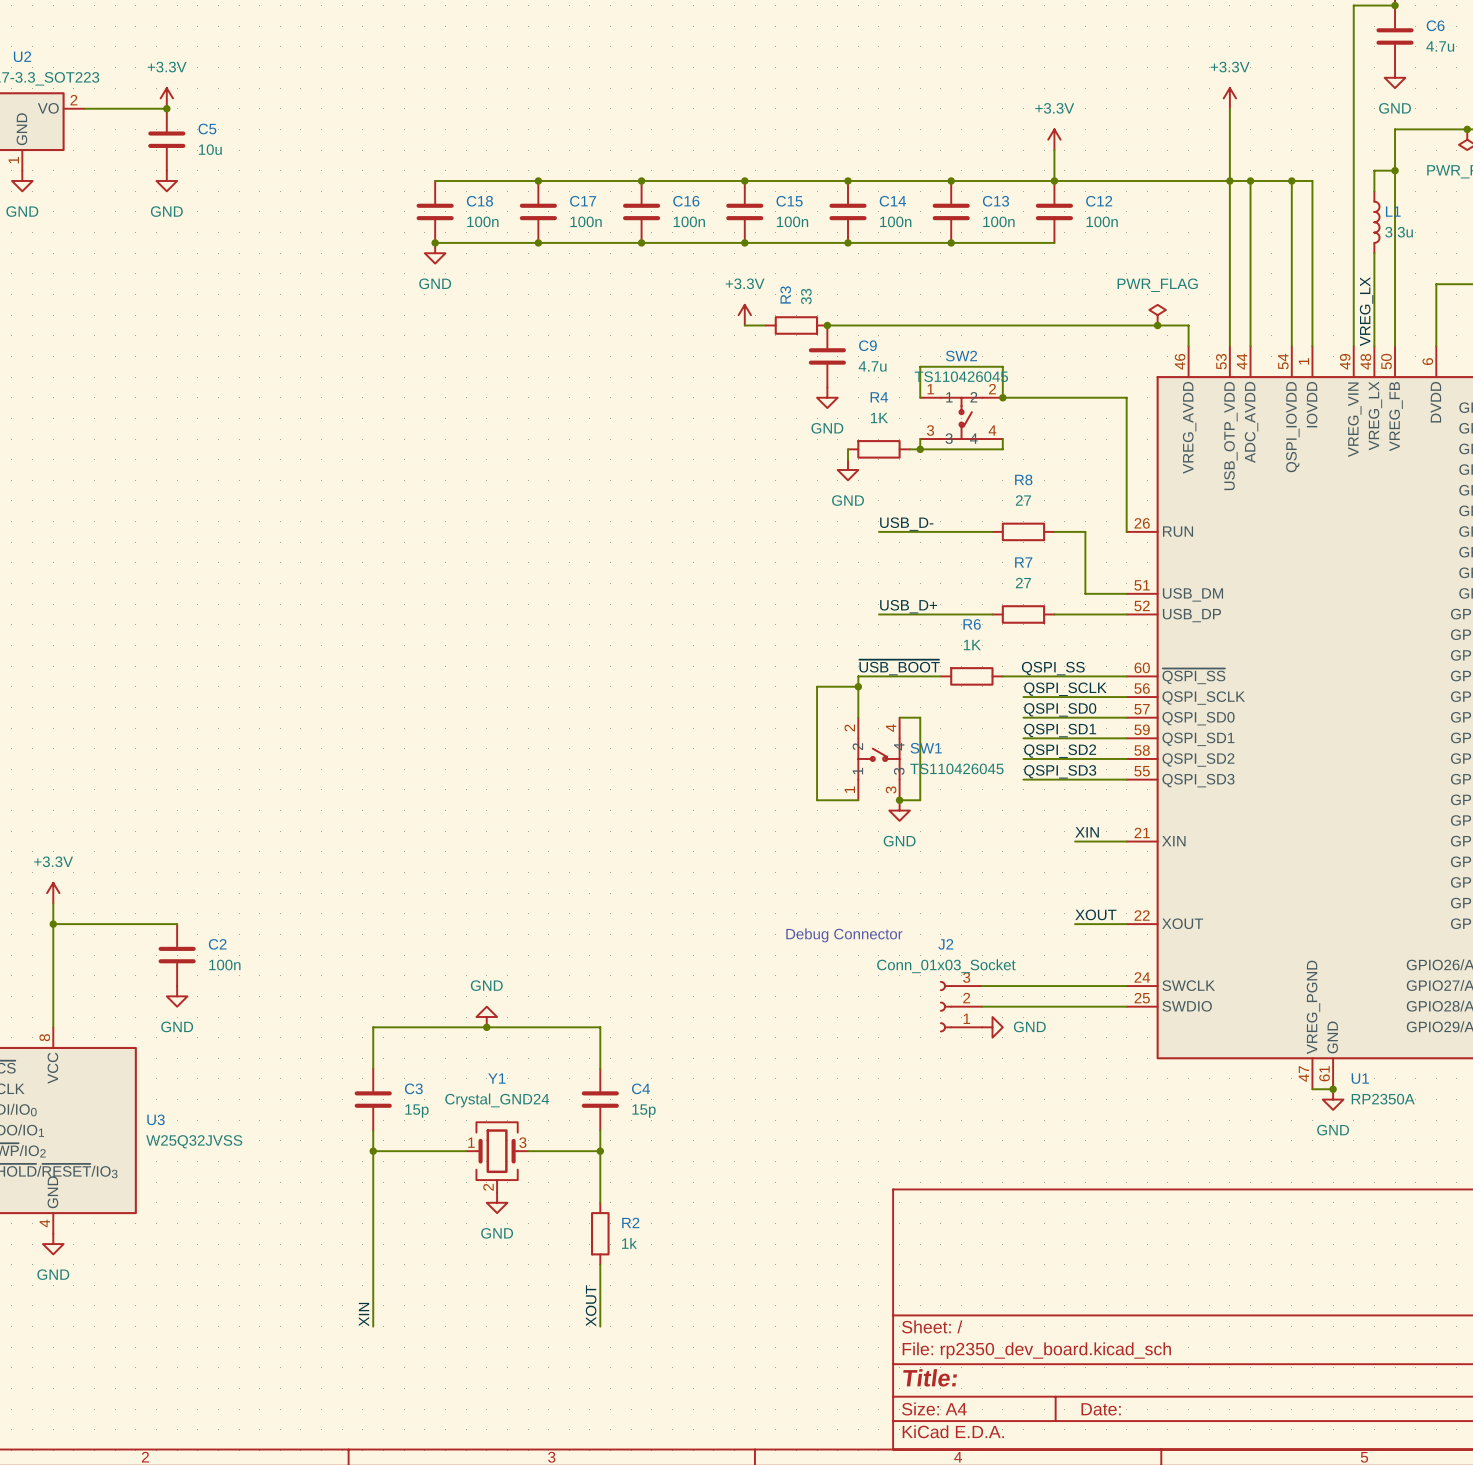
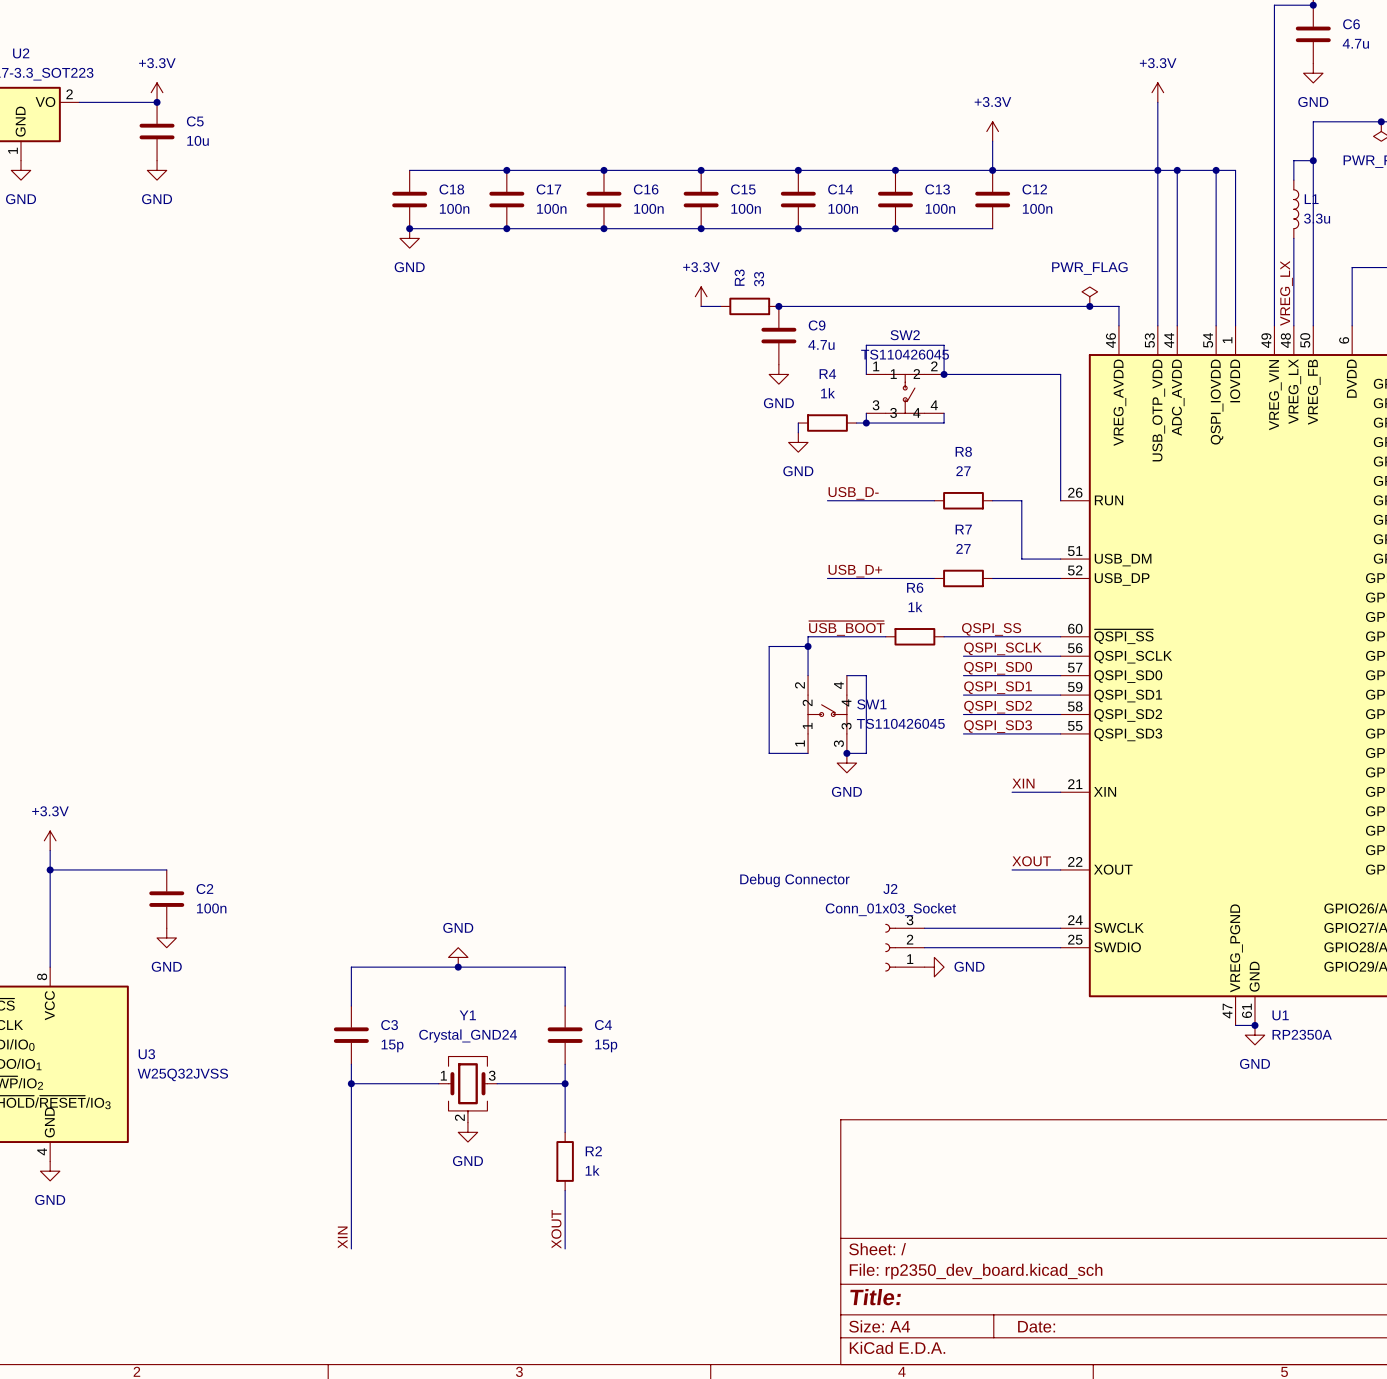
R4 value: 1K (879, 417) -> 1k (828, 393)
R6 value: 1K (972, 645) -> 1k (915, 607)

